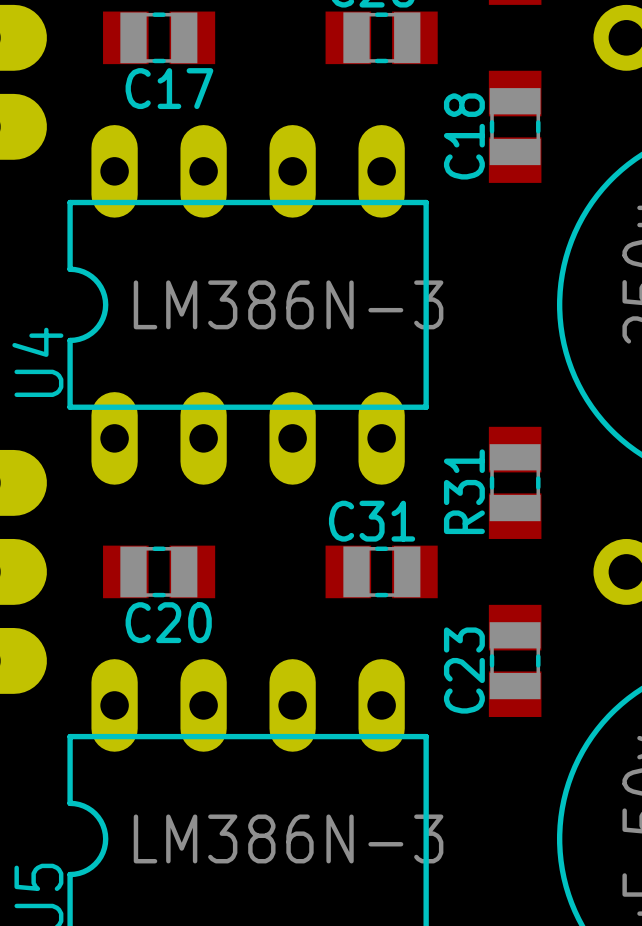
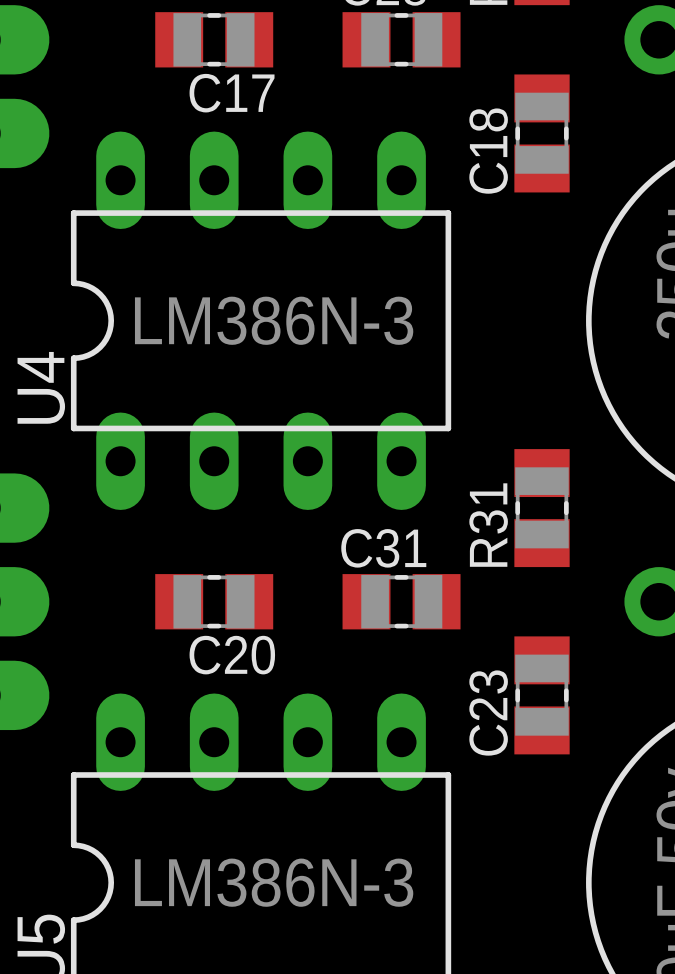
C17 position: (159, 37) -> (214, 39)
C20 position: (159, 571) -> (214, 601)

